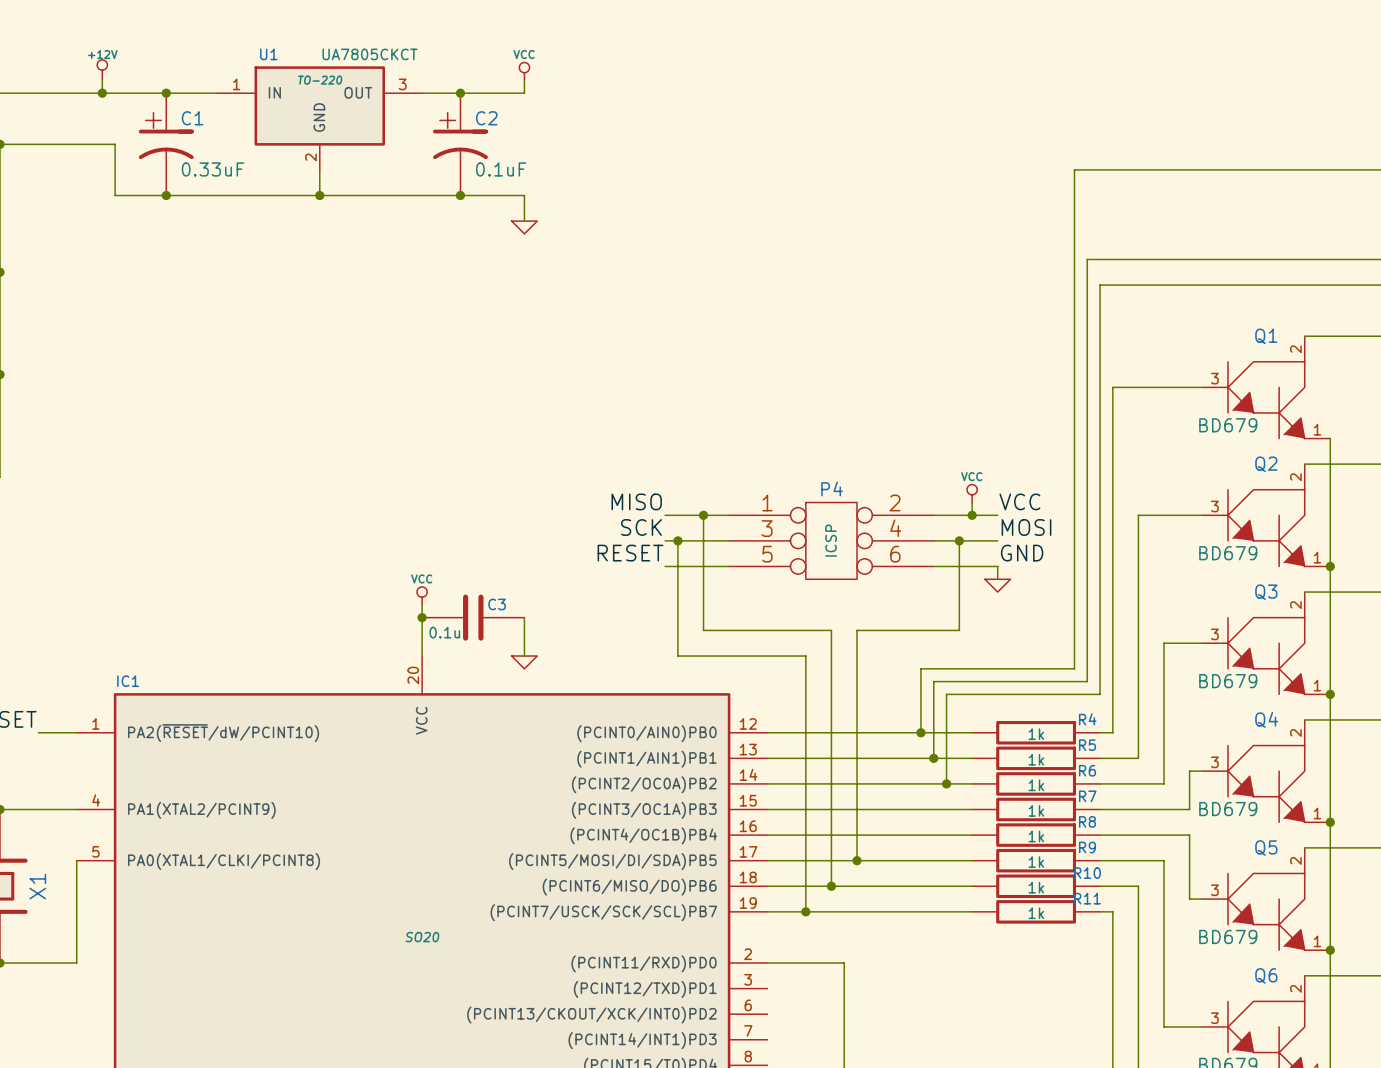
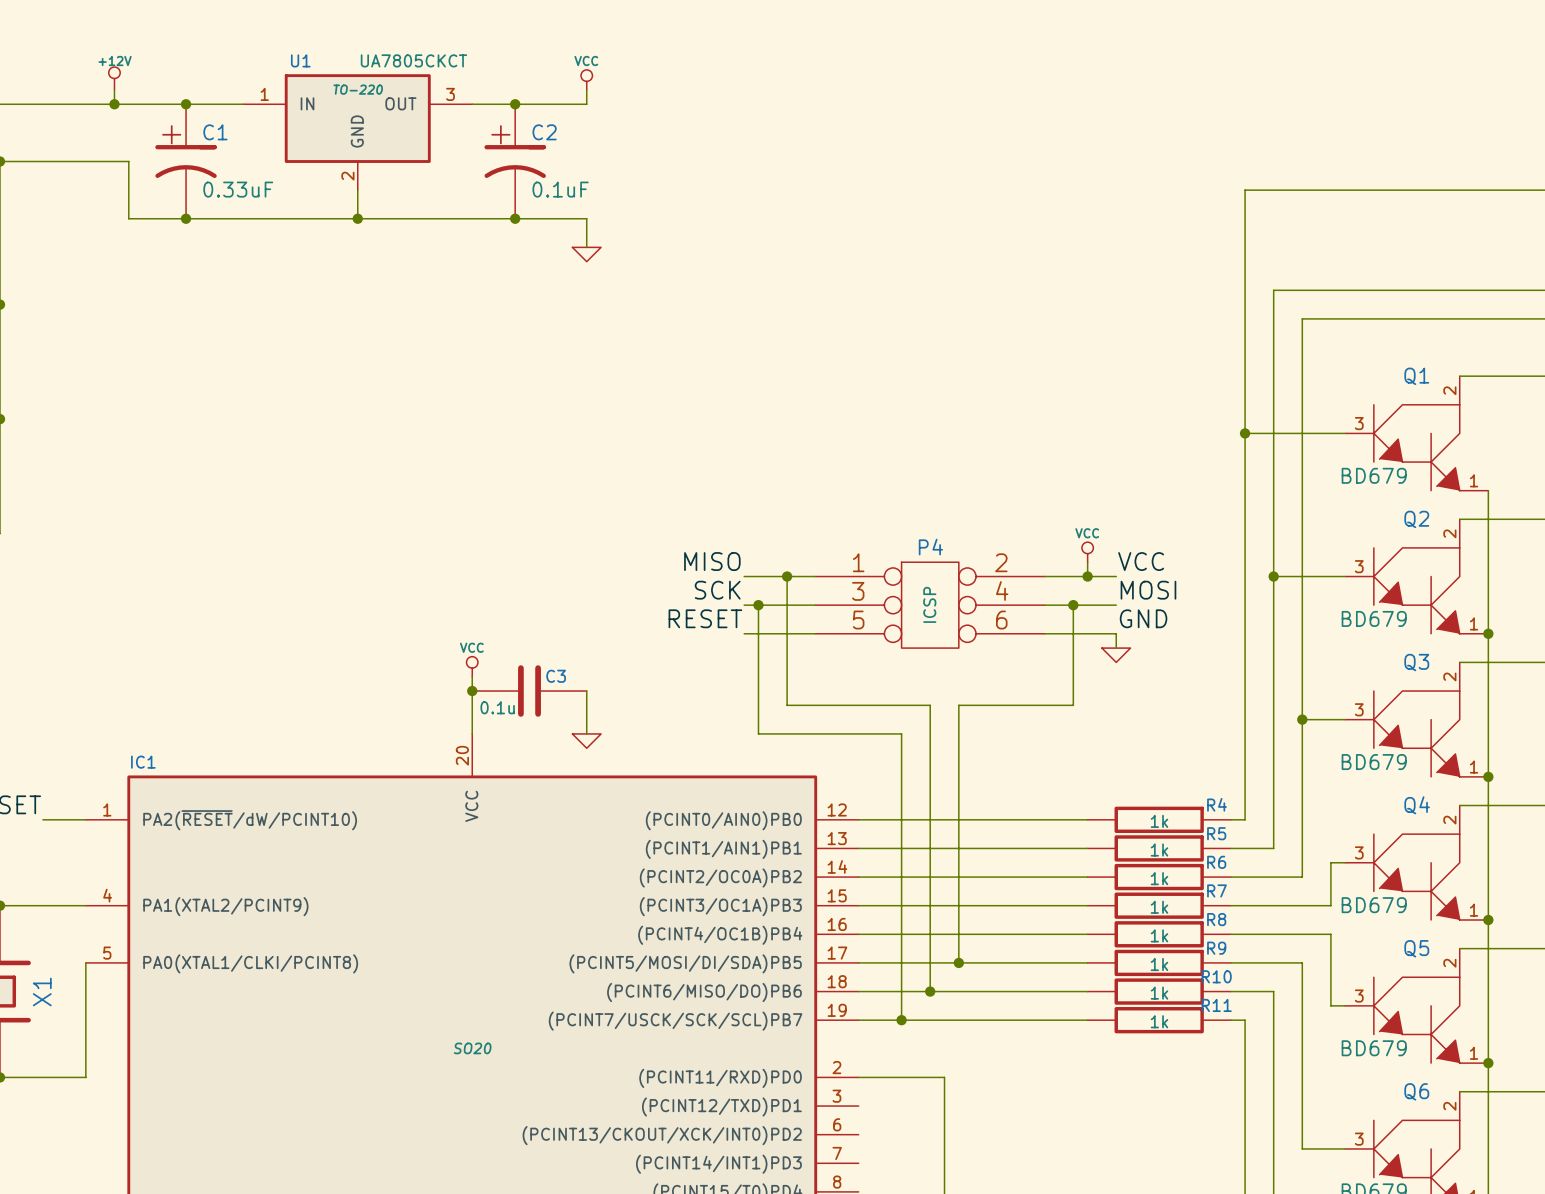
wire: (1112, 169) (1074, 169) (1074, 668) (920, 668) (920, 732) -> (1245, 190) (1245, 433)
wire: (1138, 259) (1087, 259) (1087, 681) (933, 681) (933, 758) -> (1273, 290) (1273, 576)
wire: (1164, 285) (1100, 285) (1100, 694) (946, 694) (946, 783) -> (1302, 318) (1302, 719)
junction: none -> (1245, 433)
junction: none -> (1273, 576)
junction: none -> (1302, 719)
junction: (920, 732) -> none
junction: (933, 758) -> none
junction: (946, 783) -> none

